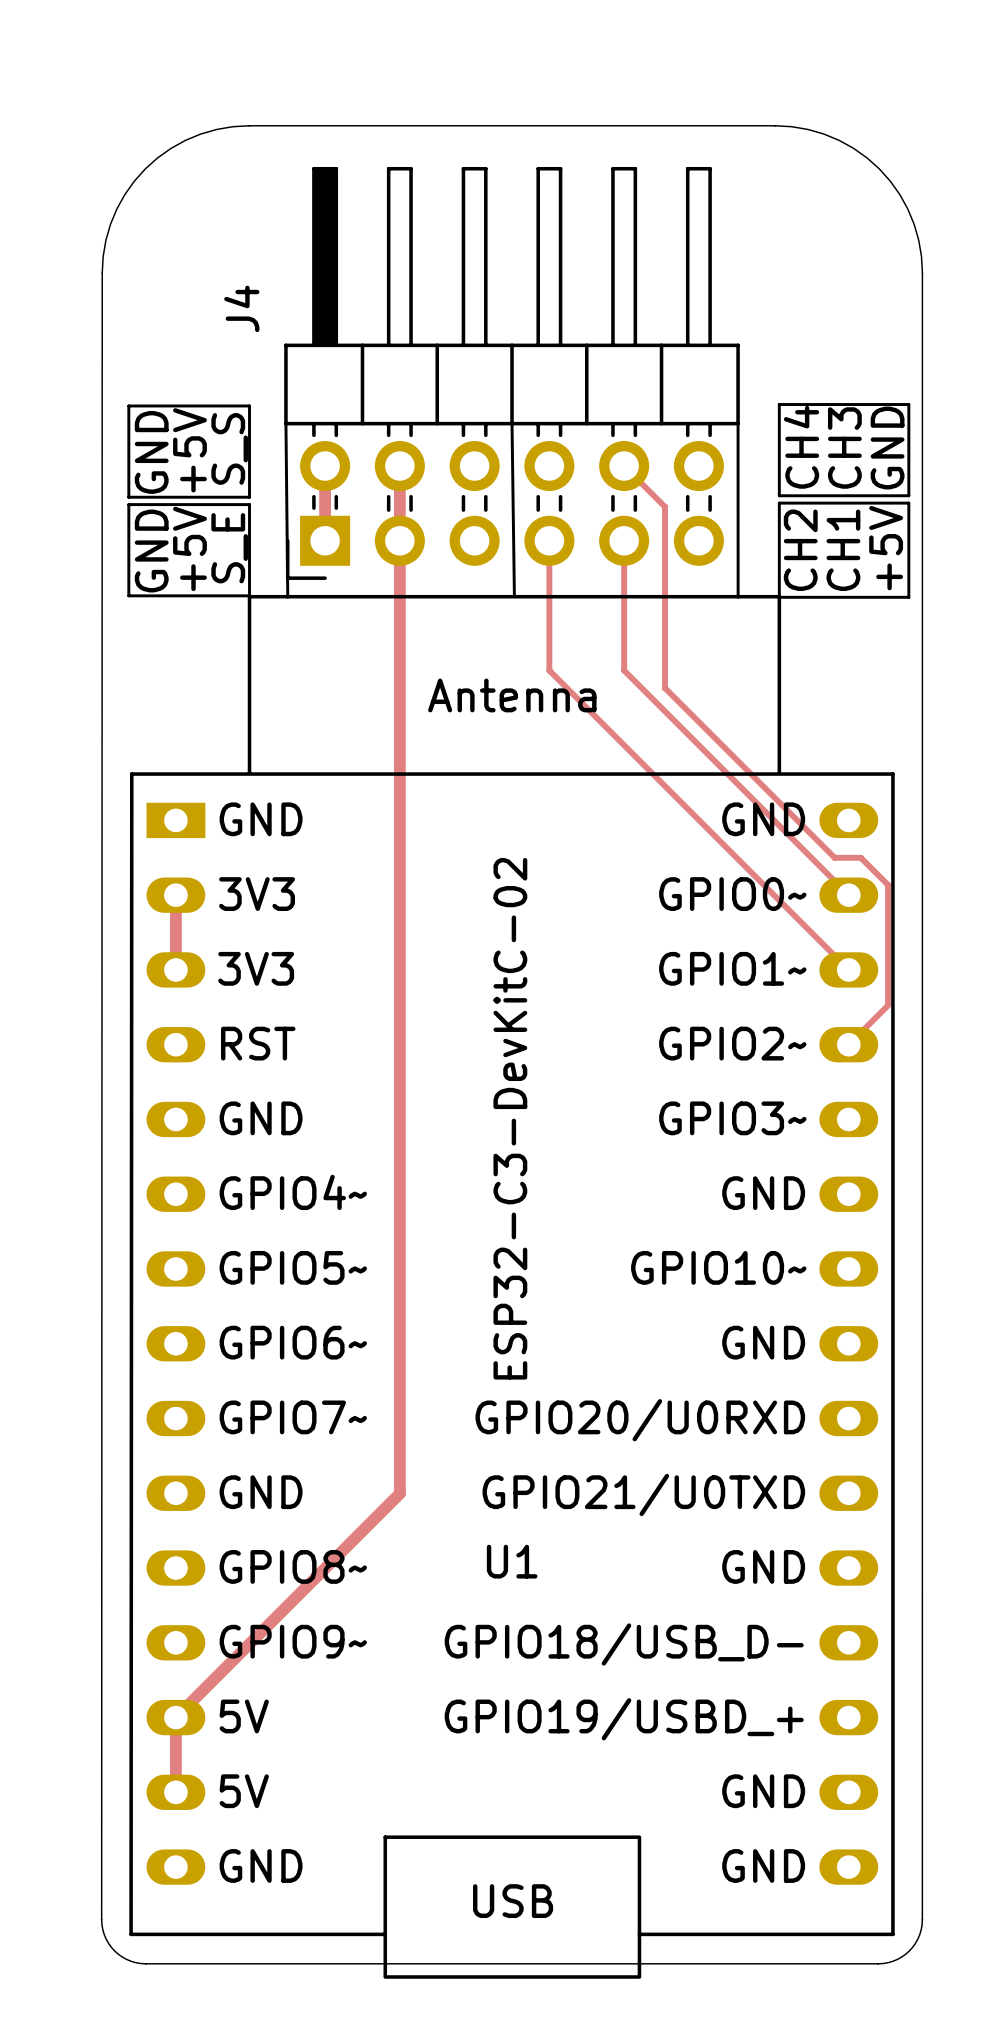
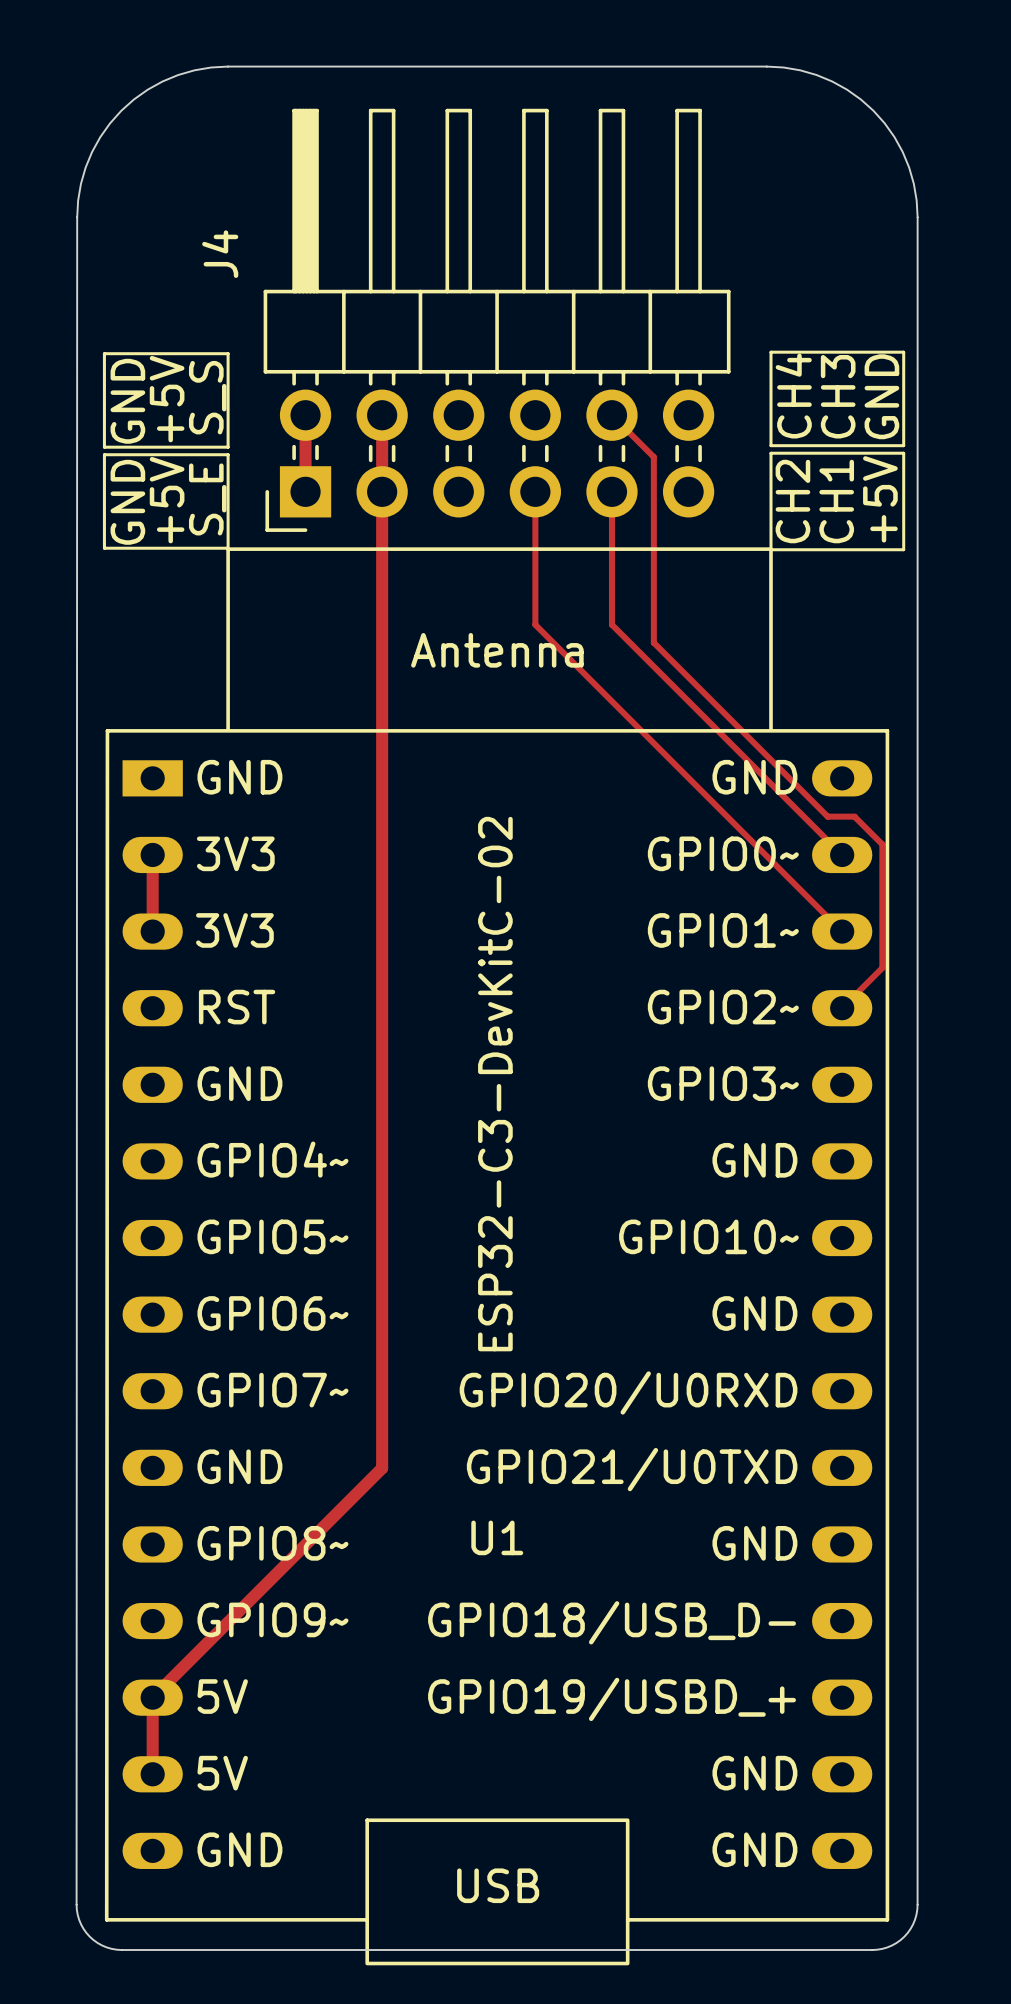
line: (285, 423) (287, 597) -> none
line: (512, 423) (514, 596) -> none
line: (738, 423) (738, 597) -> none

